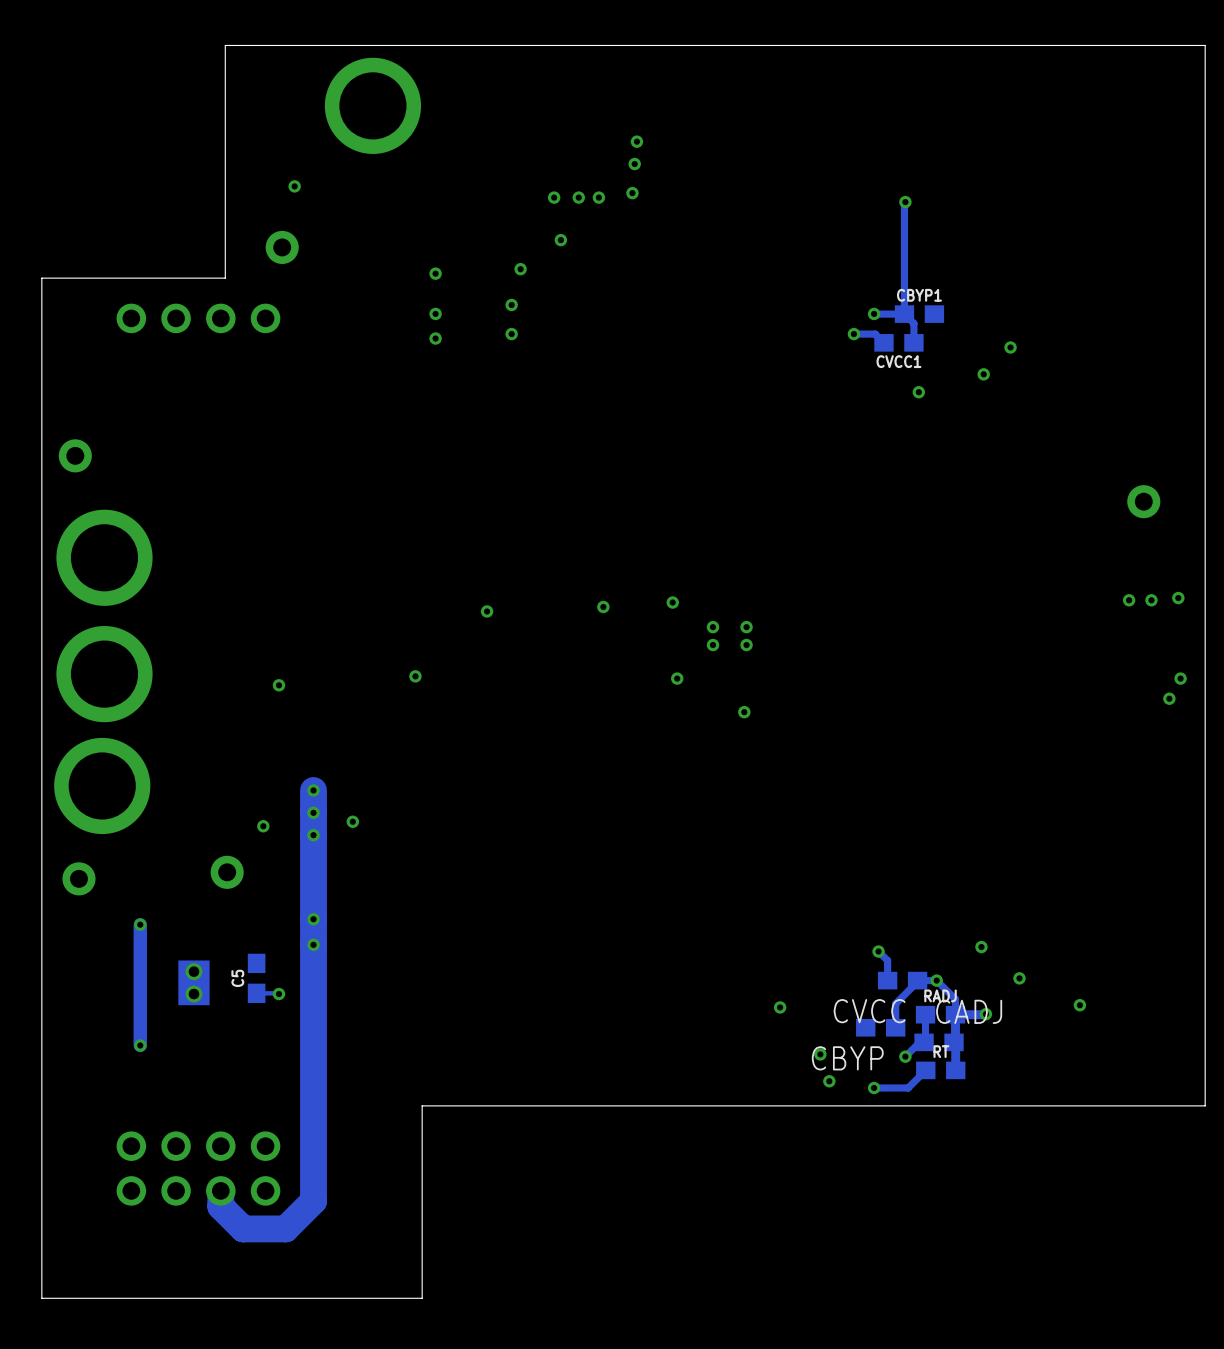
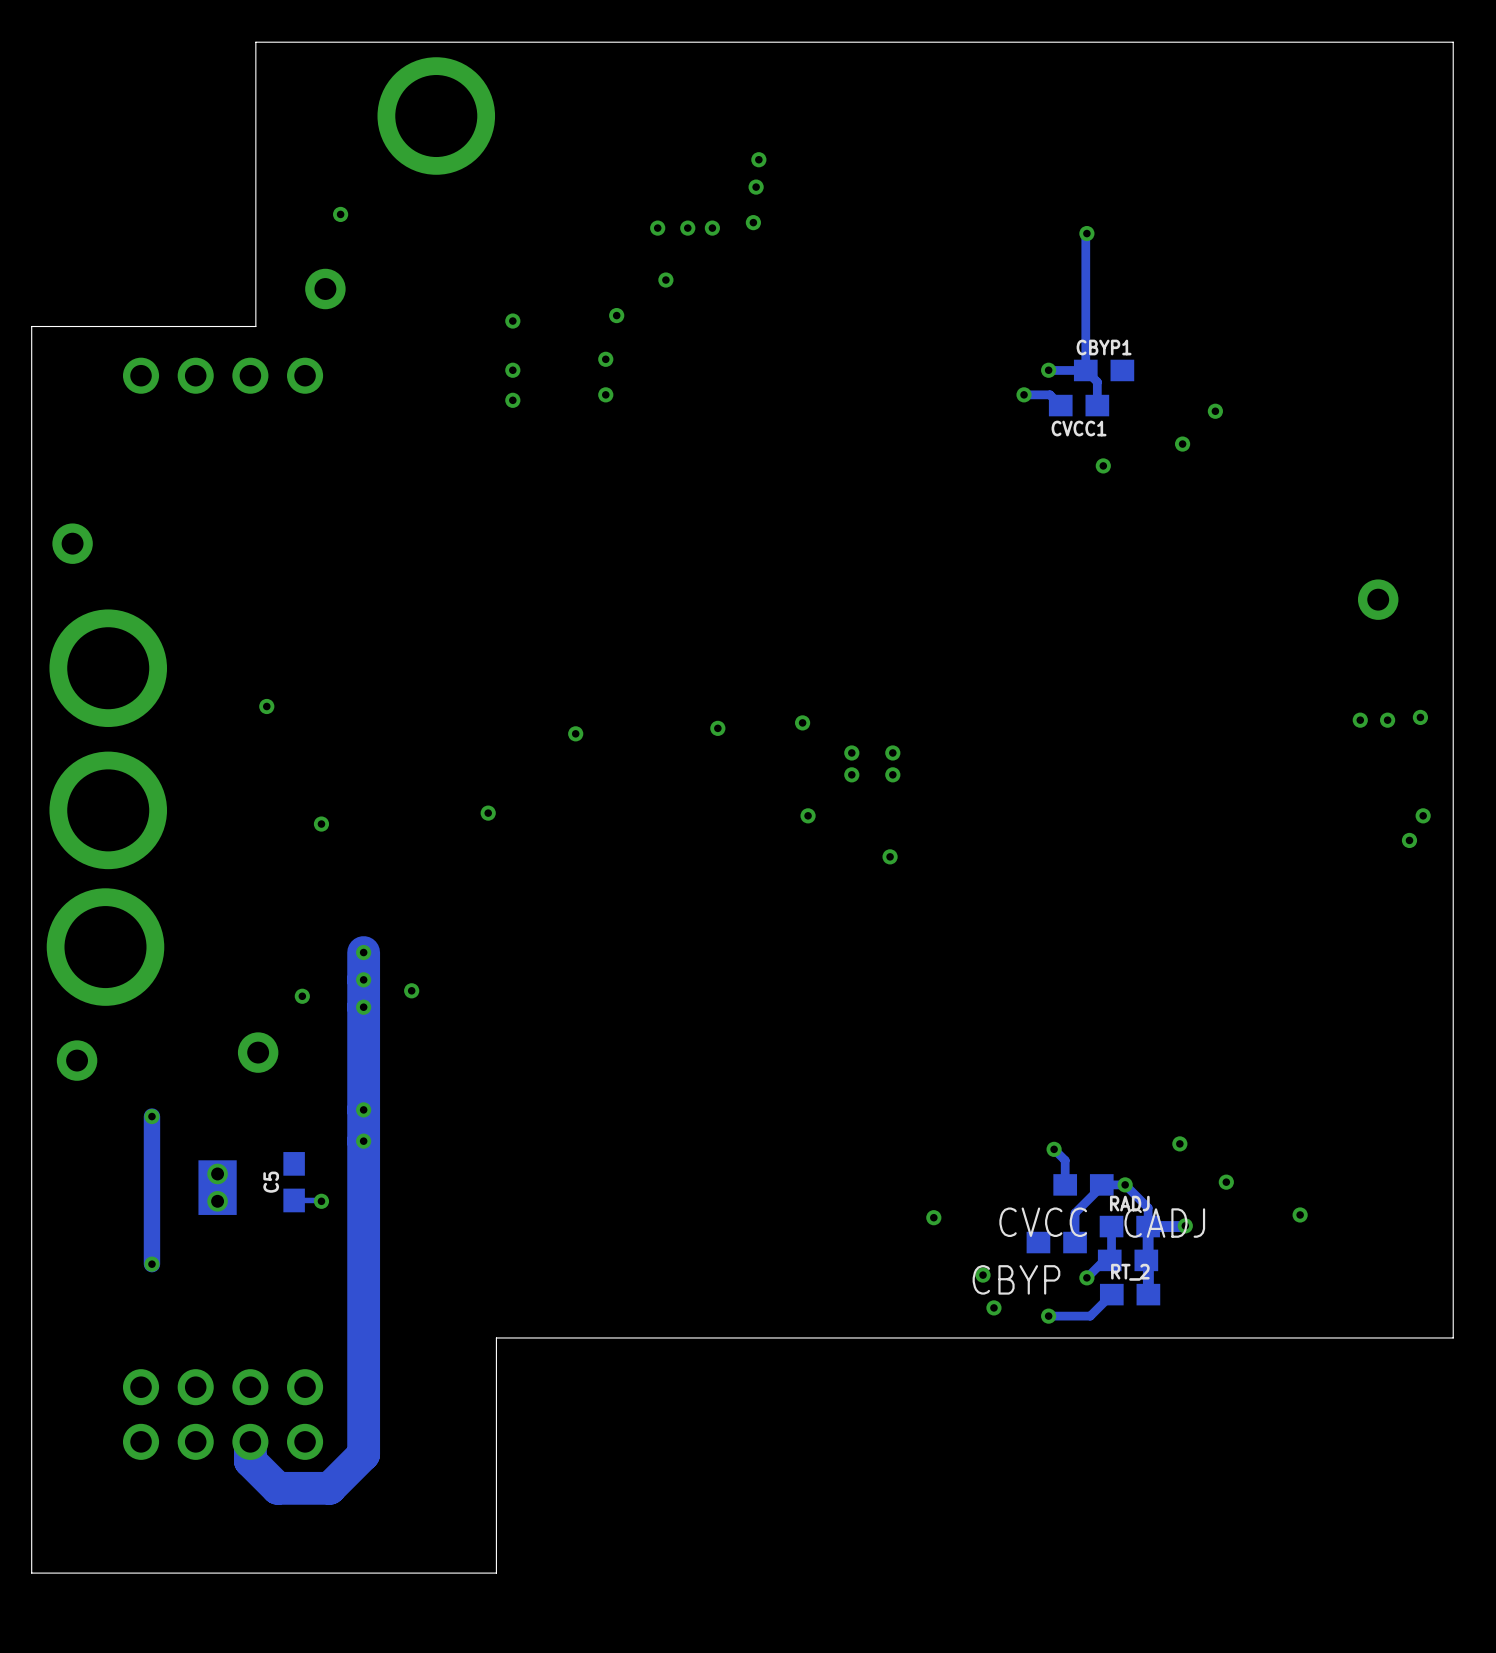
via: none -> (266, 706)
RT name: RT (941, 1051) -> RT_2 (1130, 1272)

